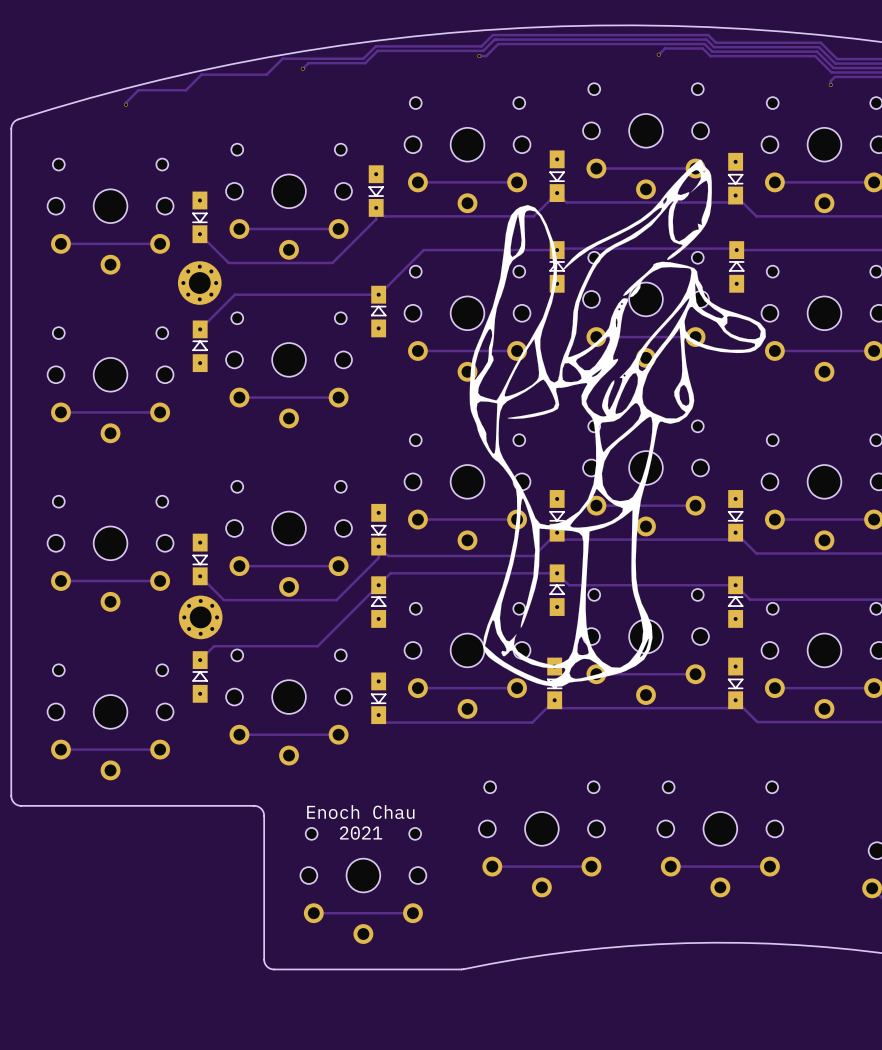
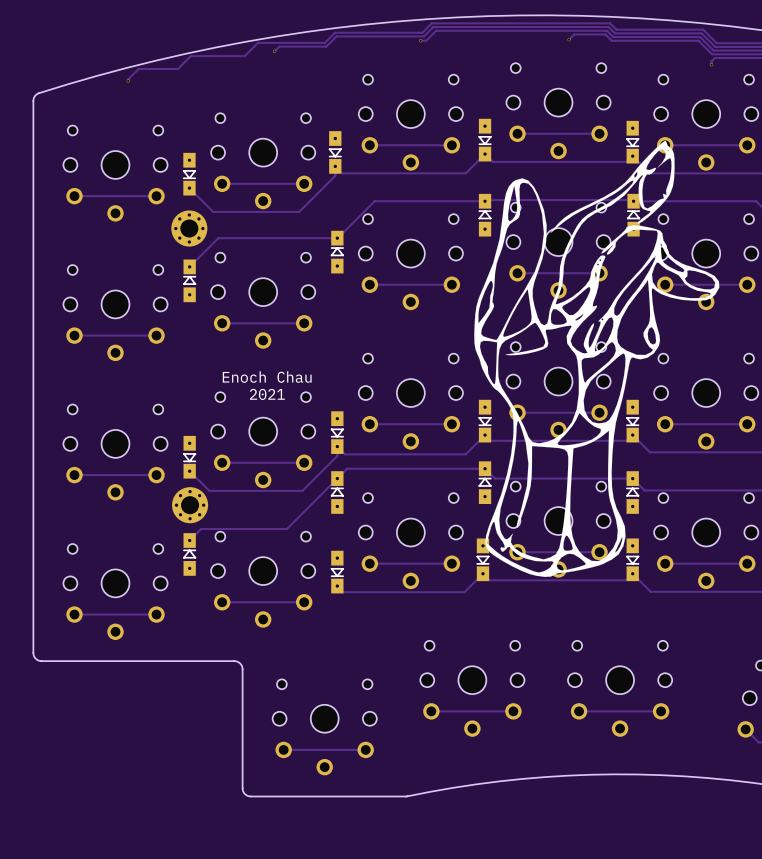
drawing position: (617, 423) -> (596, 358)
text: none -> Enoch Chau (267, 377)
text: none -> 2021 (267, 394)
text: Enoch Chau (360, 812) -> none
text: 2021 (361, 833) -> none

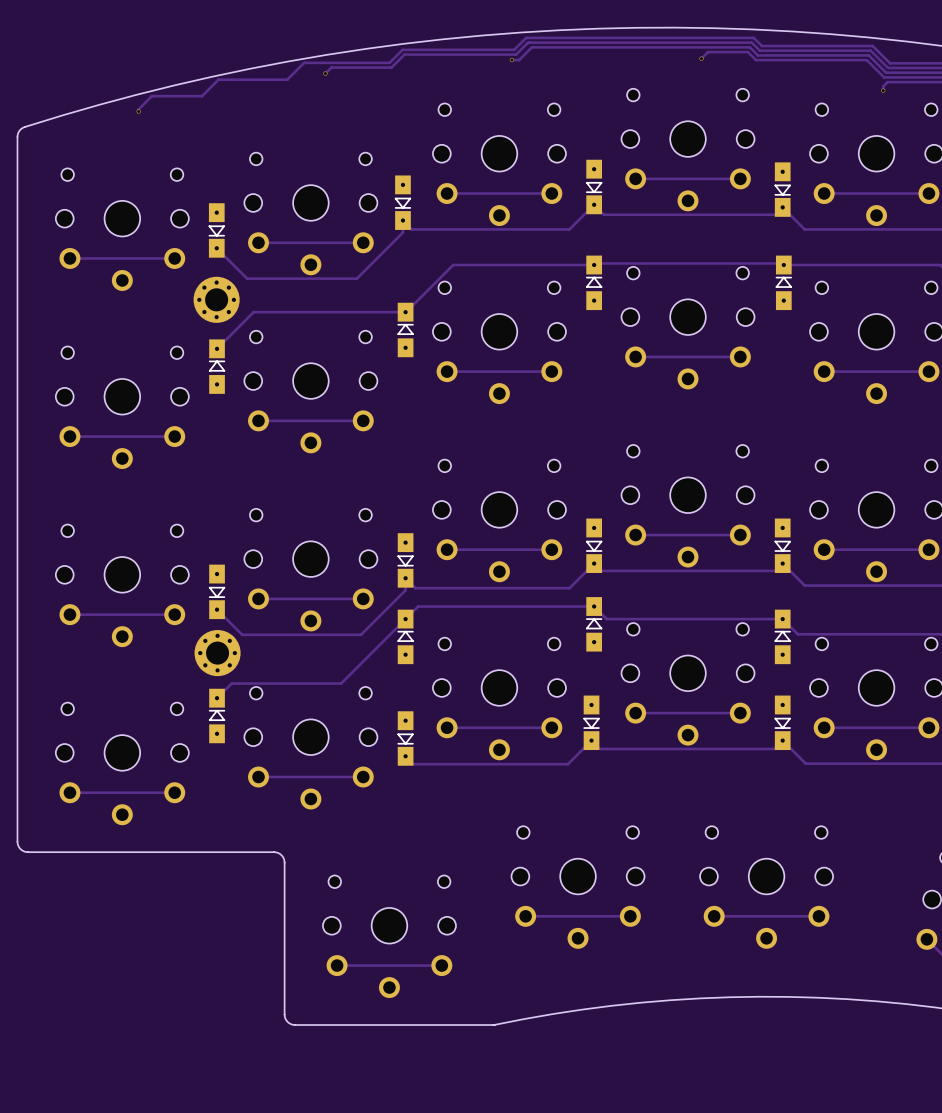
drawing: [474, 140, 720, 577] -> none
text: Enoch Chau (267, 377) -> none
text: 2021 (267, 394) -> none

